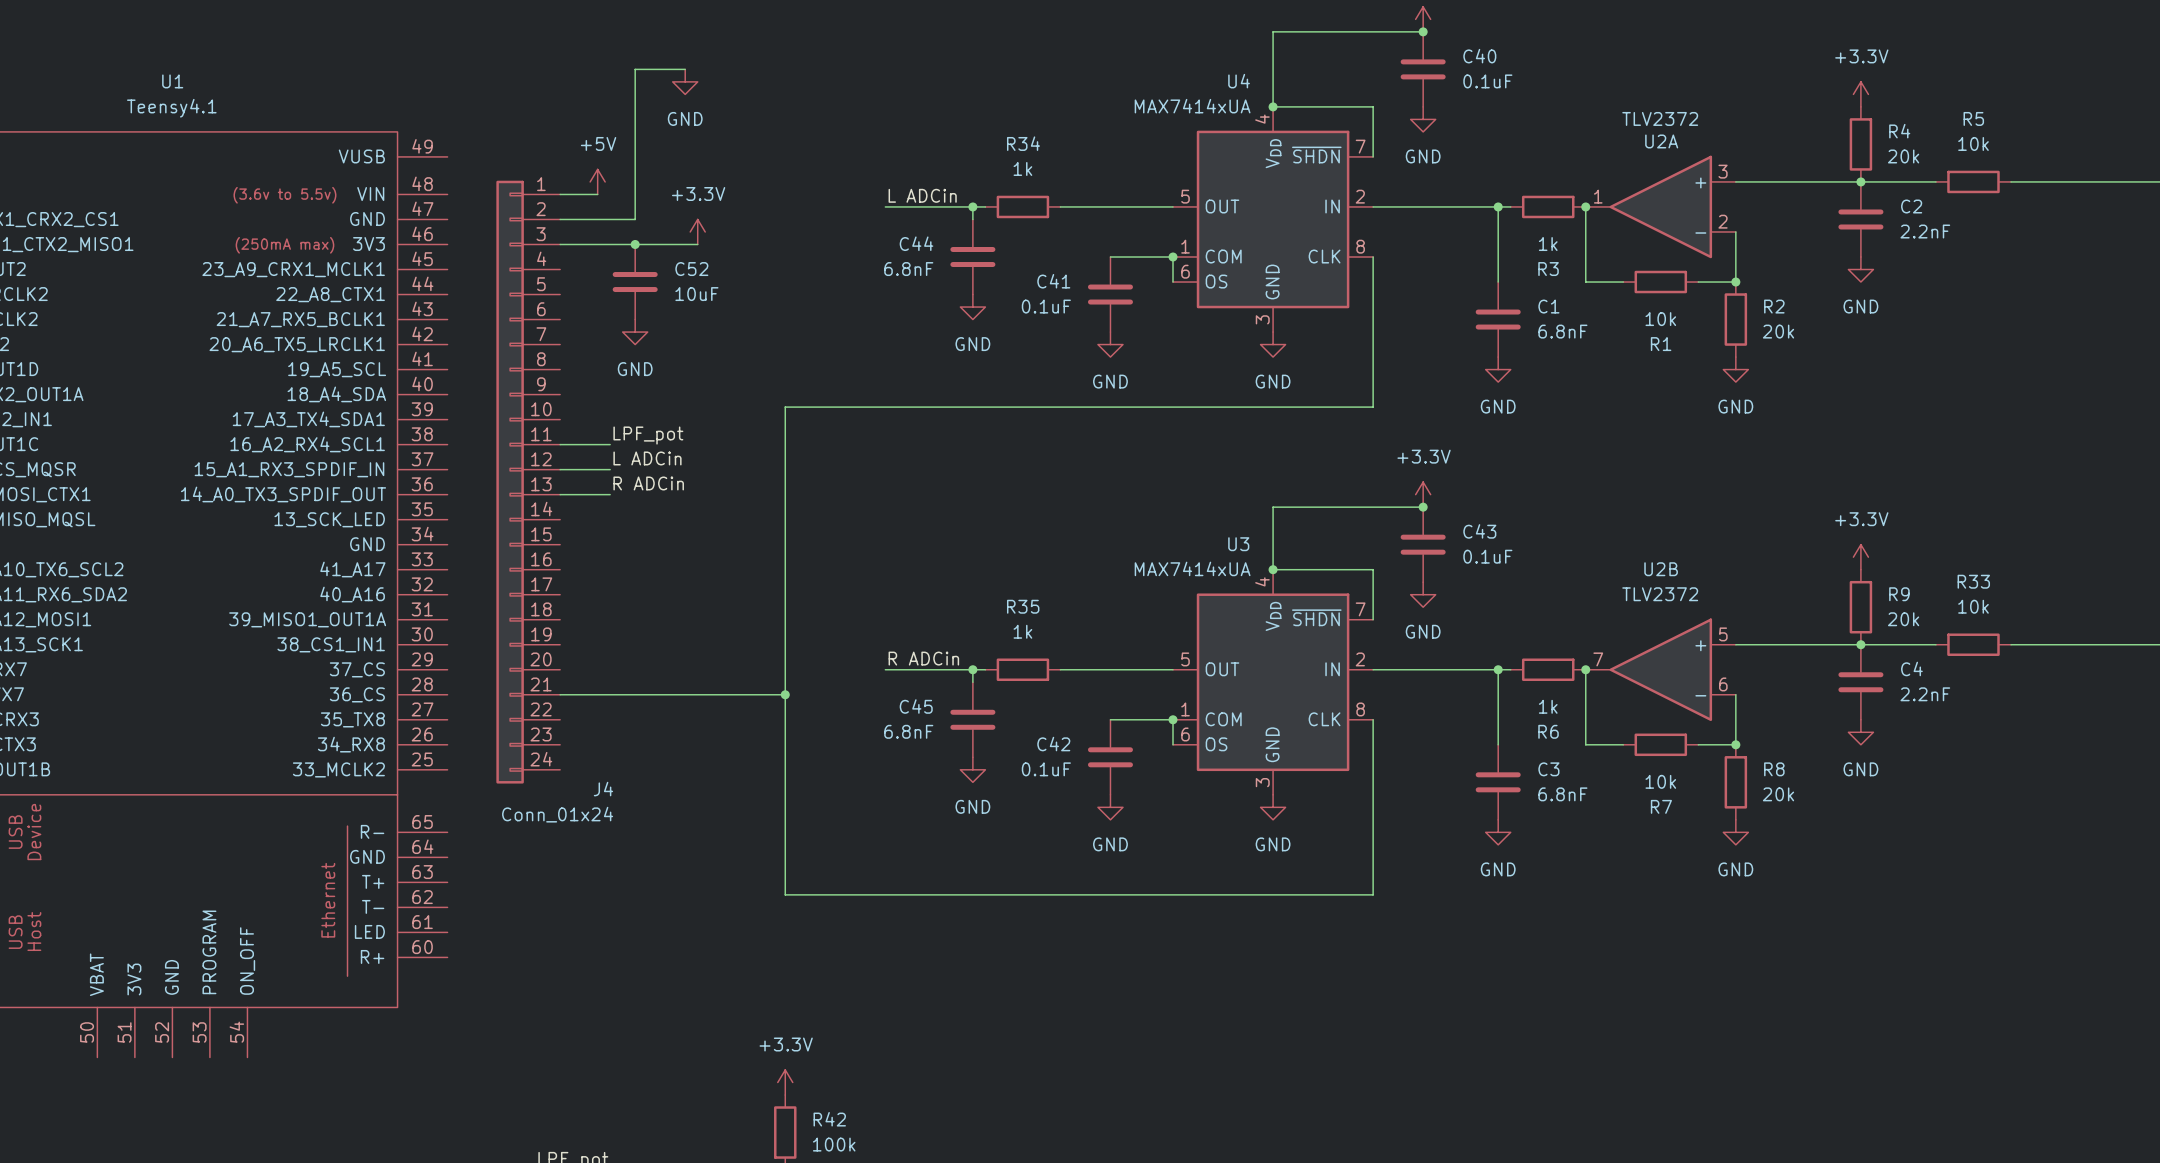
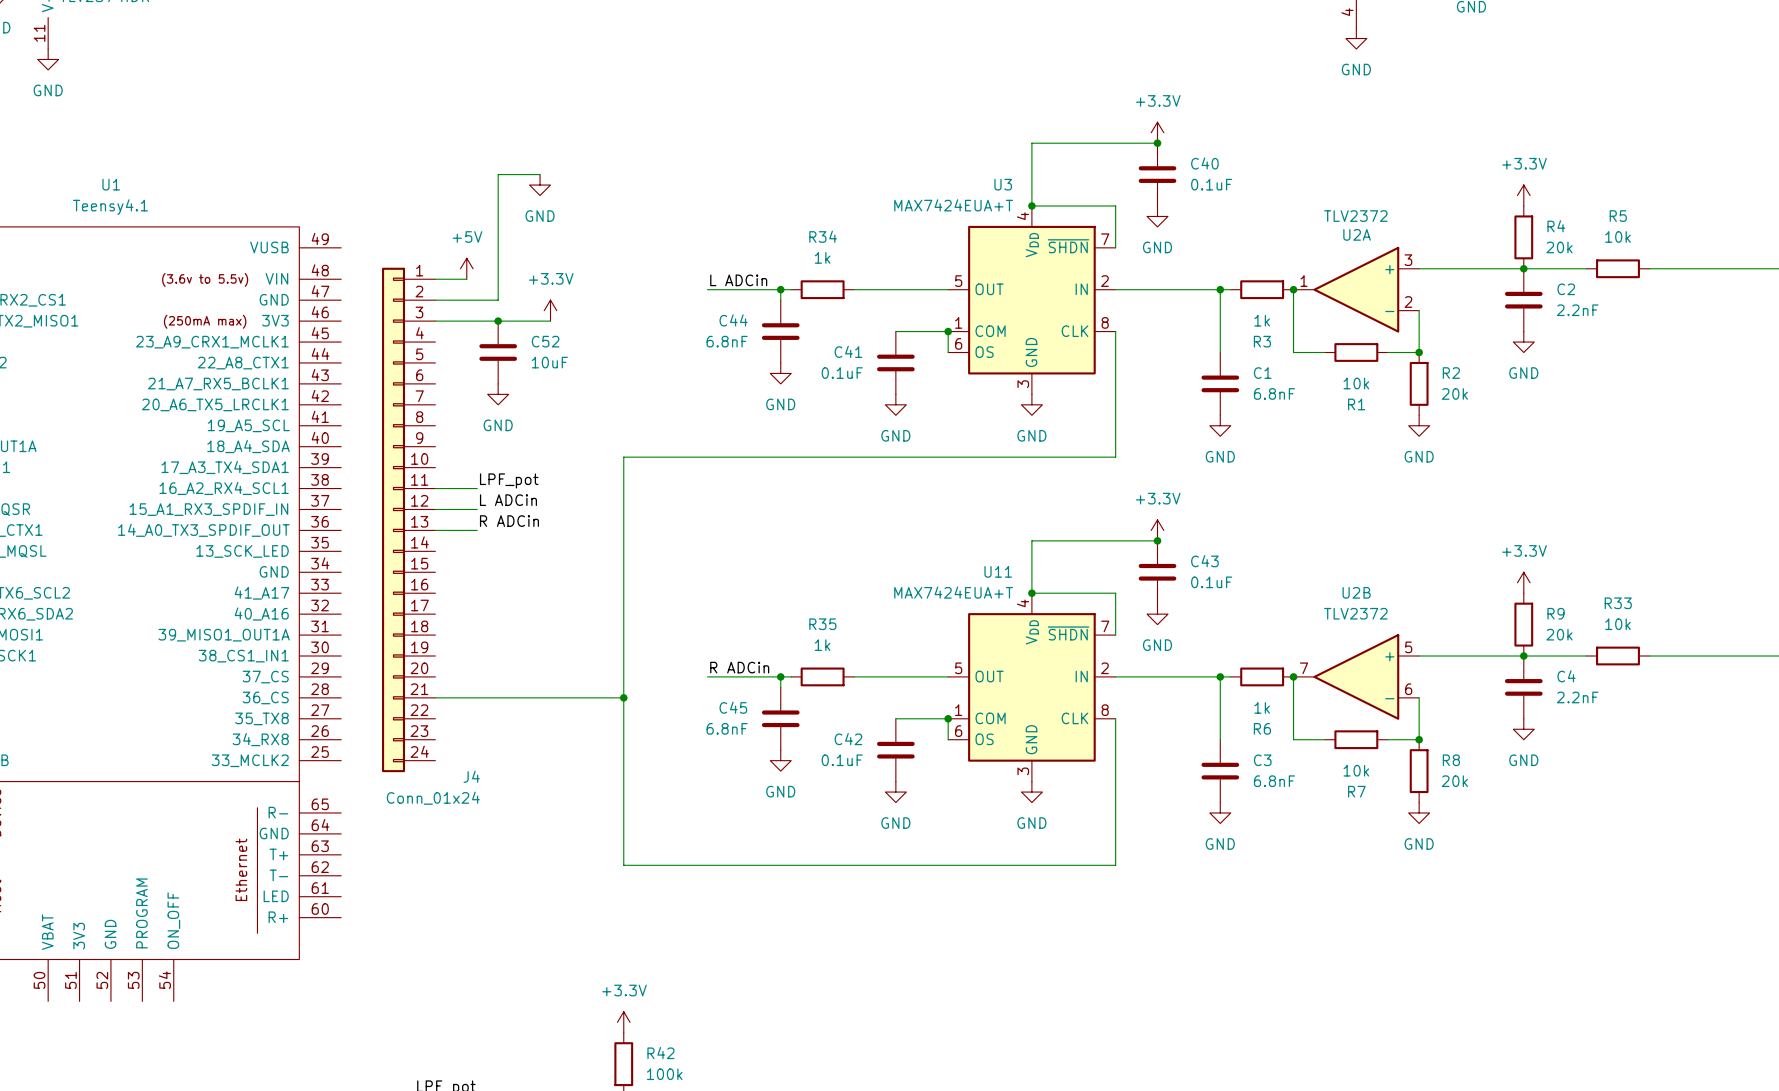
U4 name: U4 (1239, 81) -> U3 (1003, 184)
U4 value: MAX7414xUA (1192, 106) -> MAX7424EUA+T (953, 205)
U3 name: U3 (1238, 544) -> U11 (998, 571)
U3 value: MAX7414xUA (1192, 568) -> MAX7424EUA+T (953, 592)

